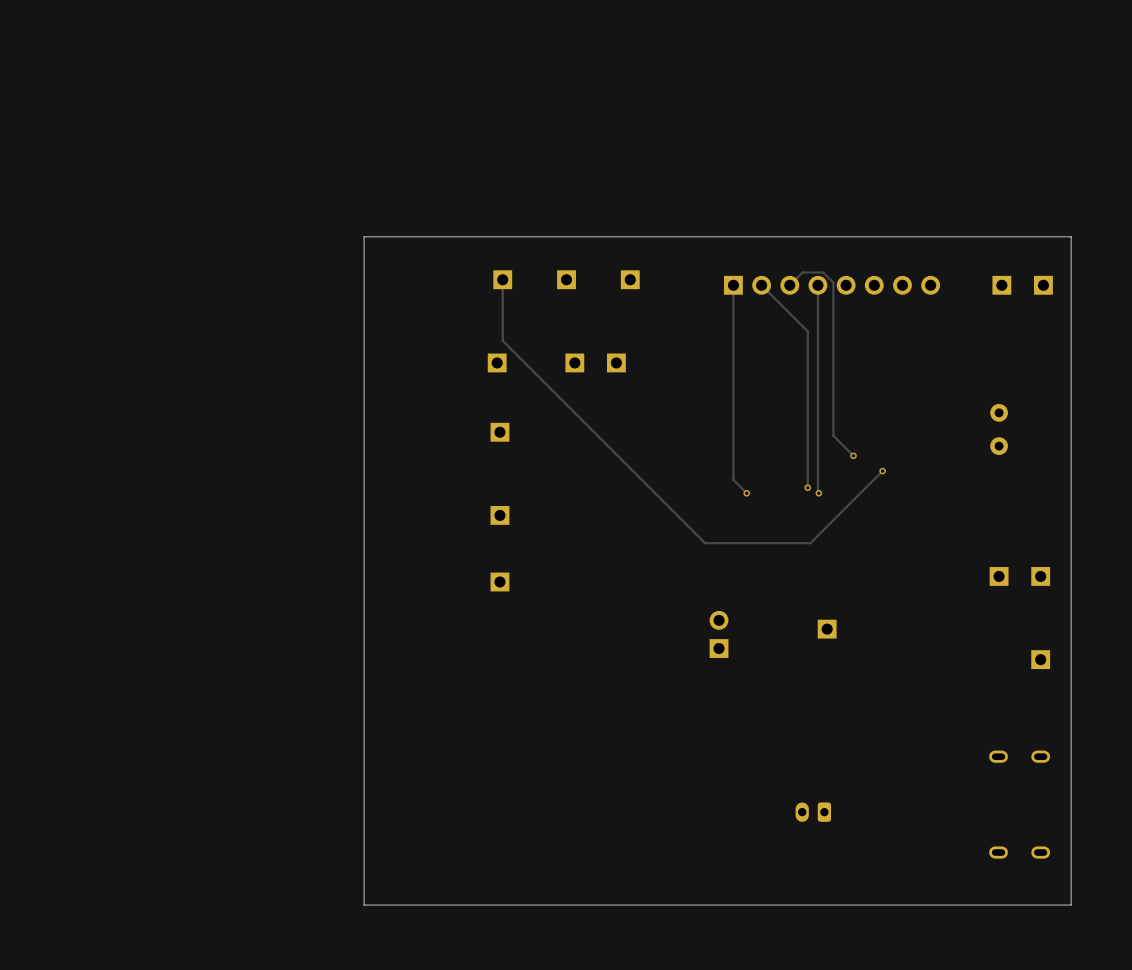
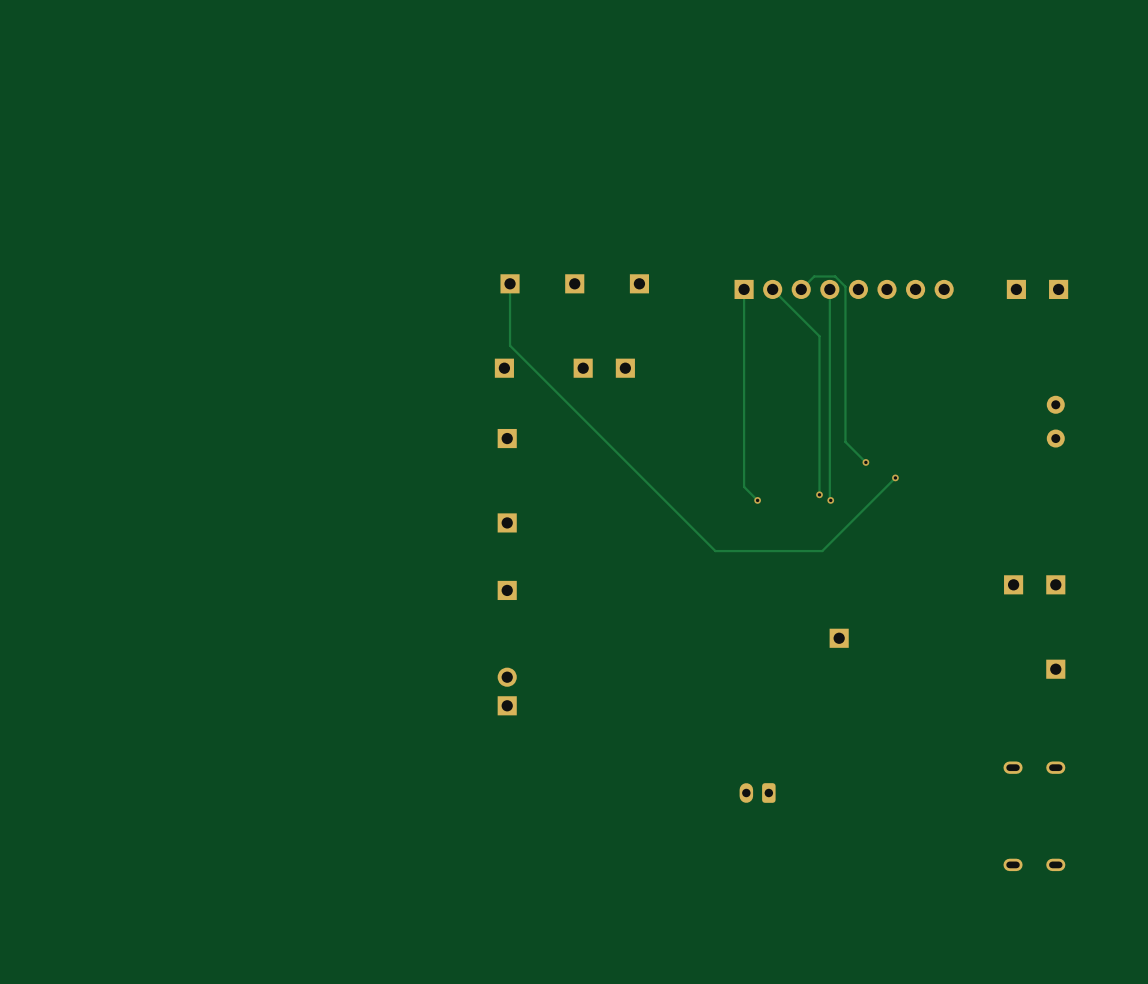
board edge: (1071, 236) (364, 236) (364, 905) (1071, 905) (1071, 236) -> none
part position: (999, 429) -> (1055, 421)
part position: (719, 634) -> (507, 691)
part position: (813, 812) -> (757, 792)

